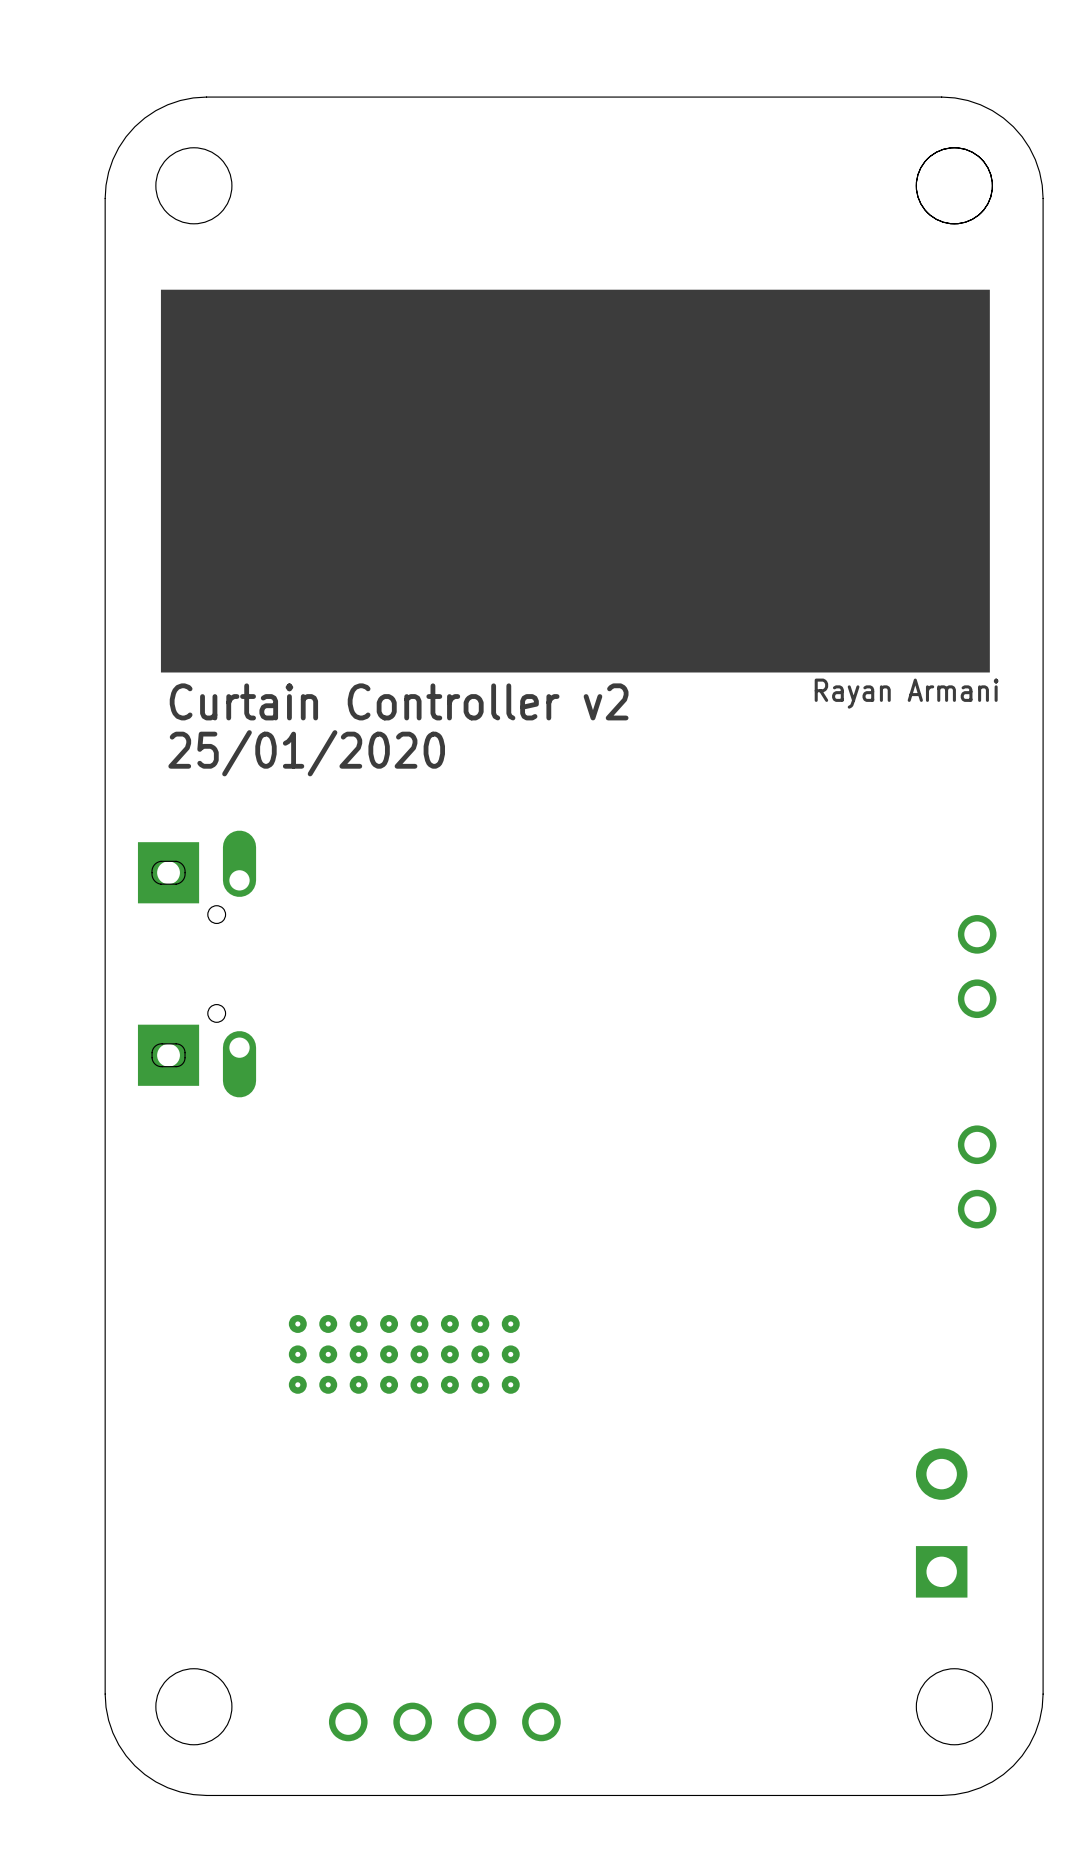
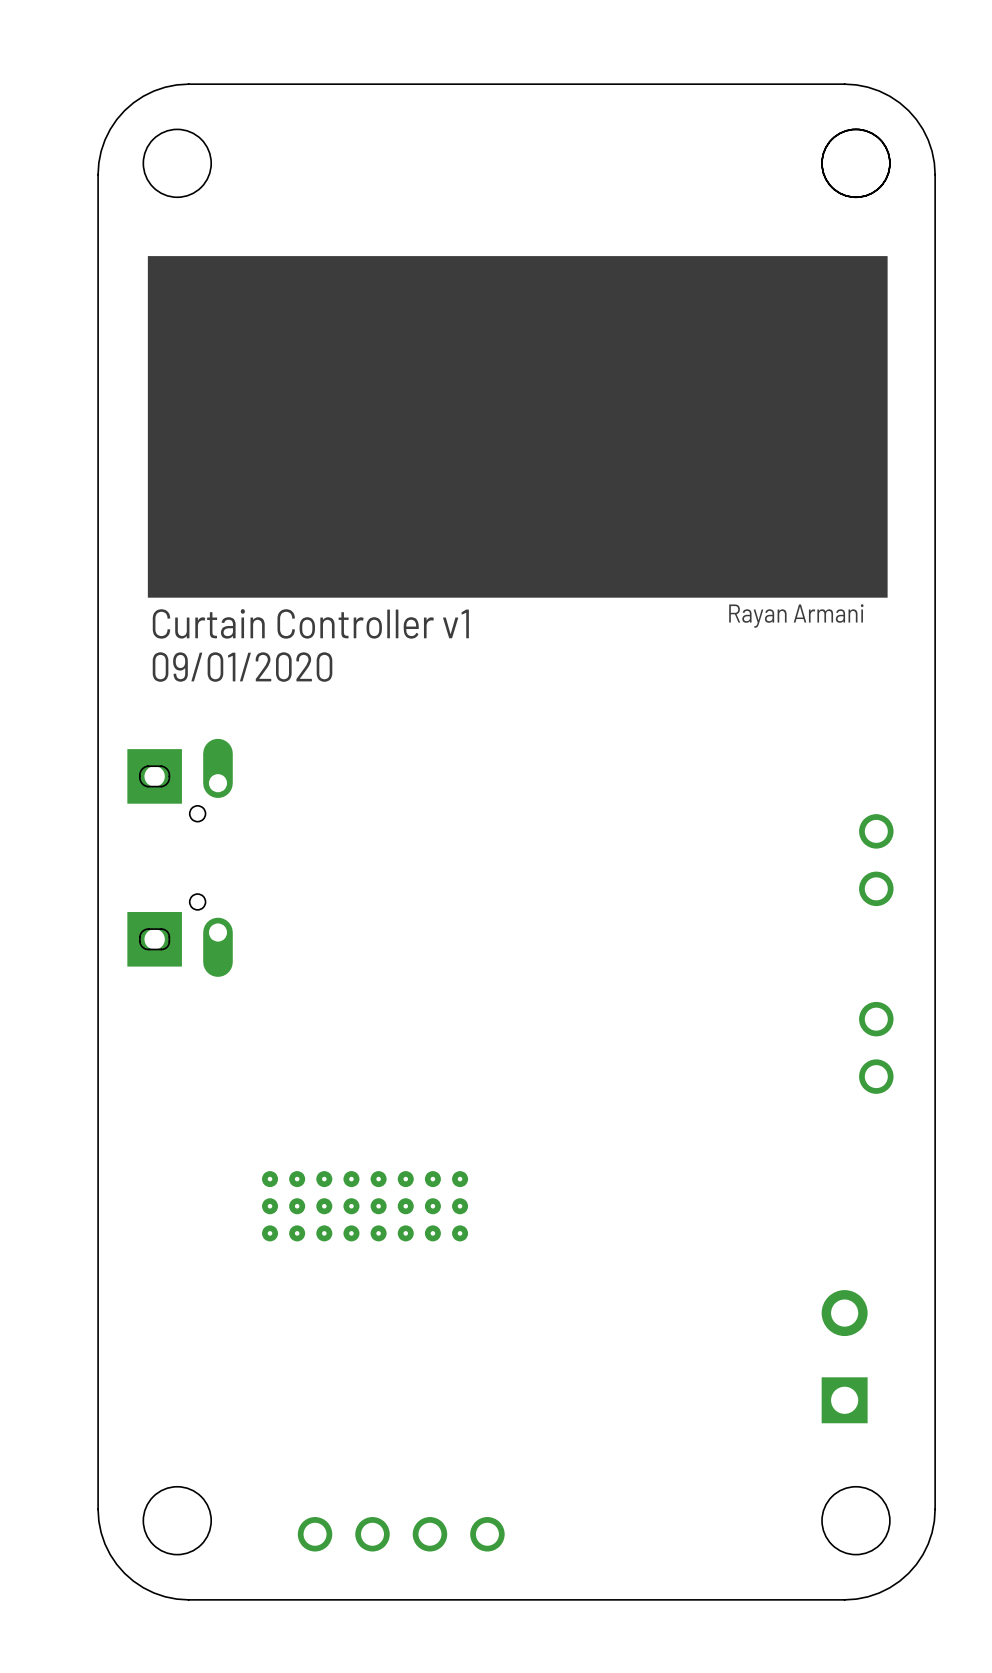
text: Curtain Controller v2 (399, 701) -> Curtain Controller v1 (310, 623)
text: 25/01/2020 (306, 753) -> 09/01/2020 (242, 667)

